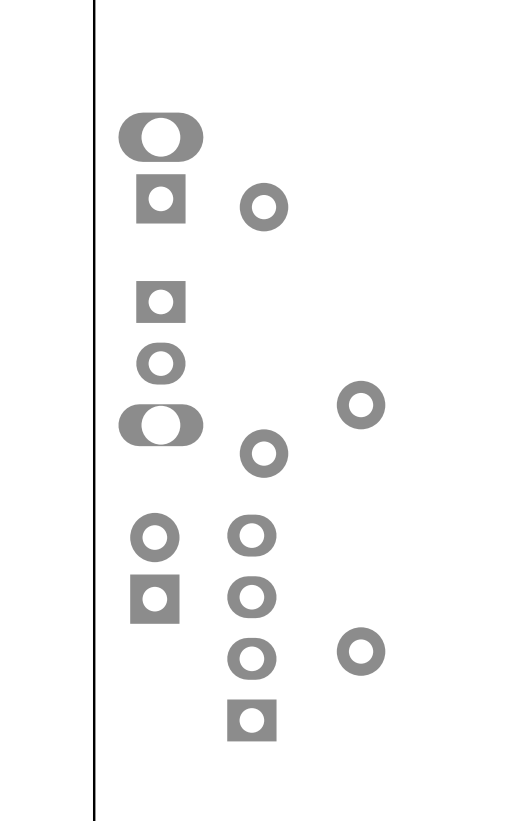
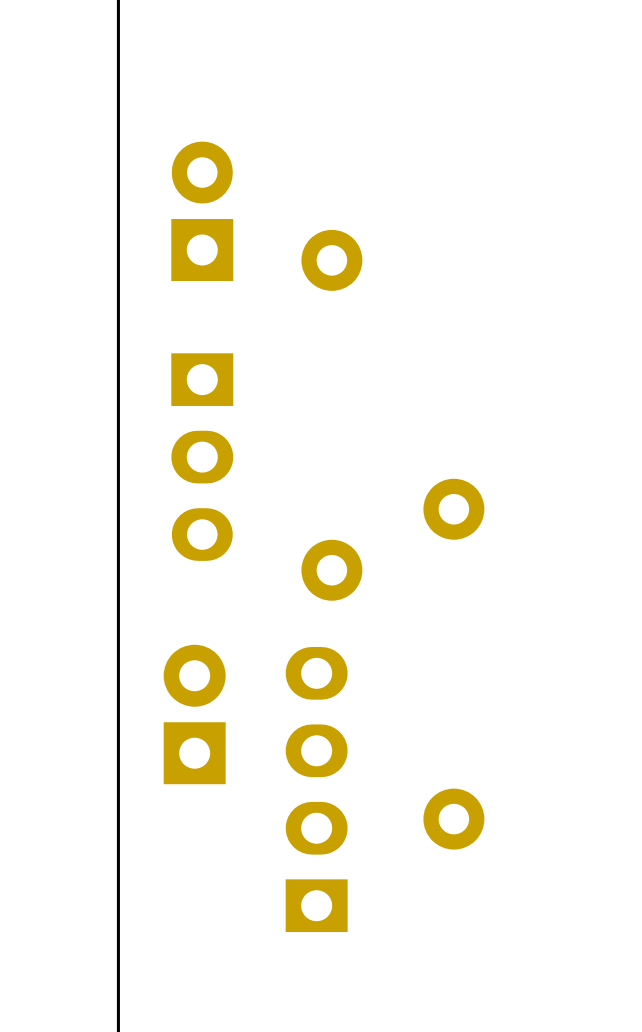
part footprint: [118, 112, 204, 224] -> [171, 141, 234, 281]
part footprint: [118, 281, 204, 447] -> [171, 353, 234, 561]

